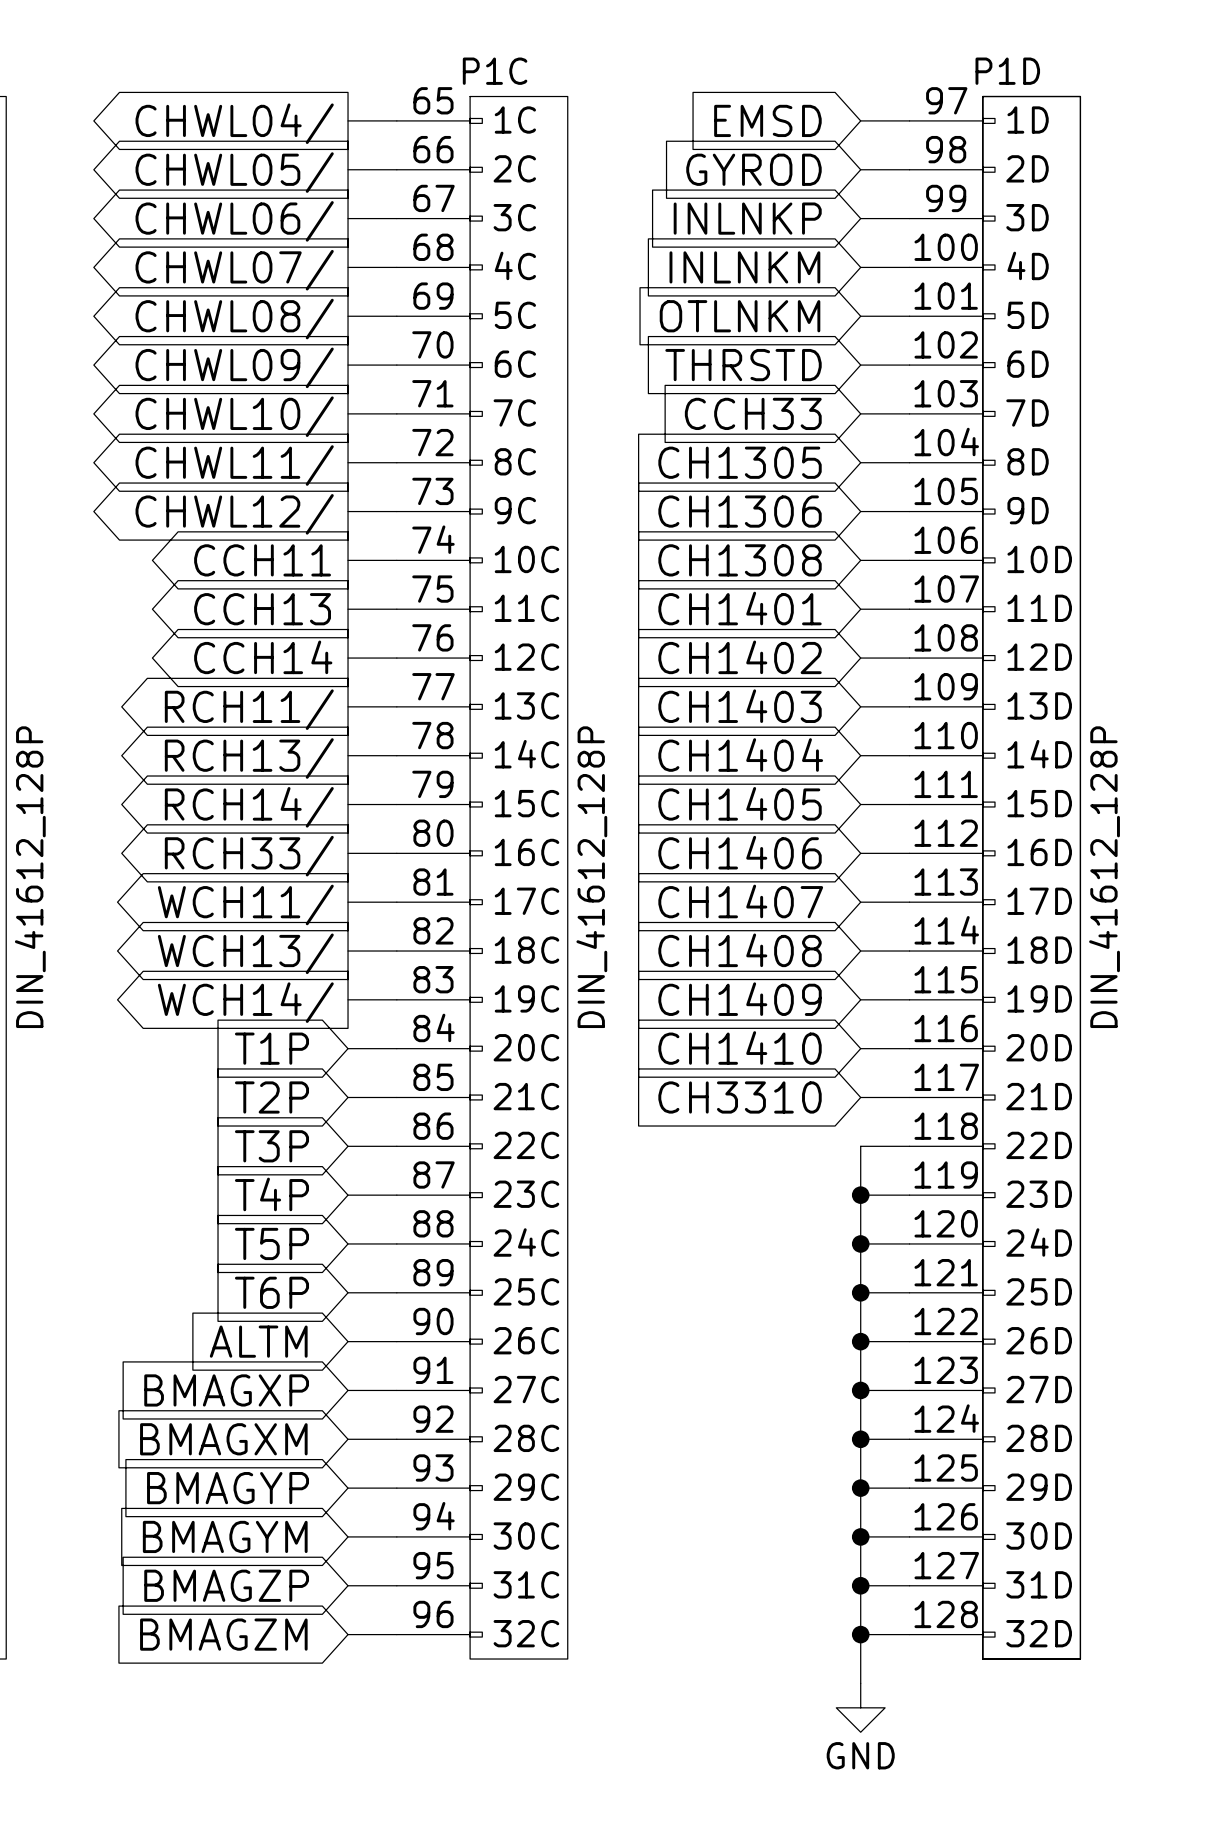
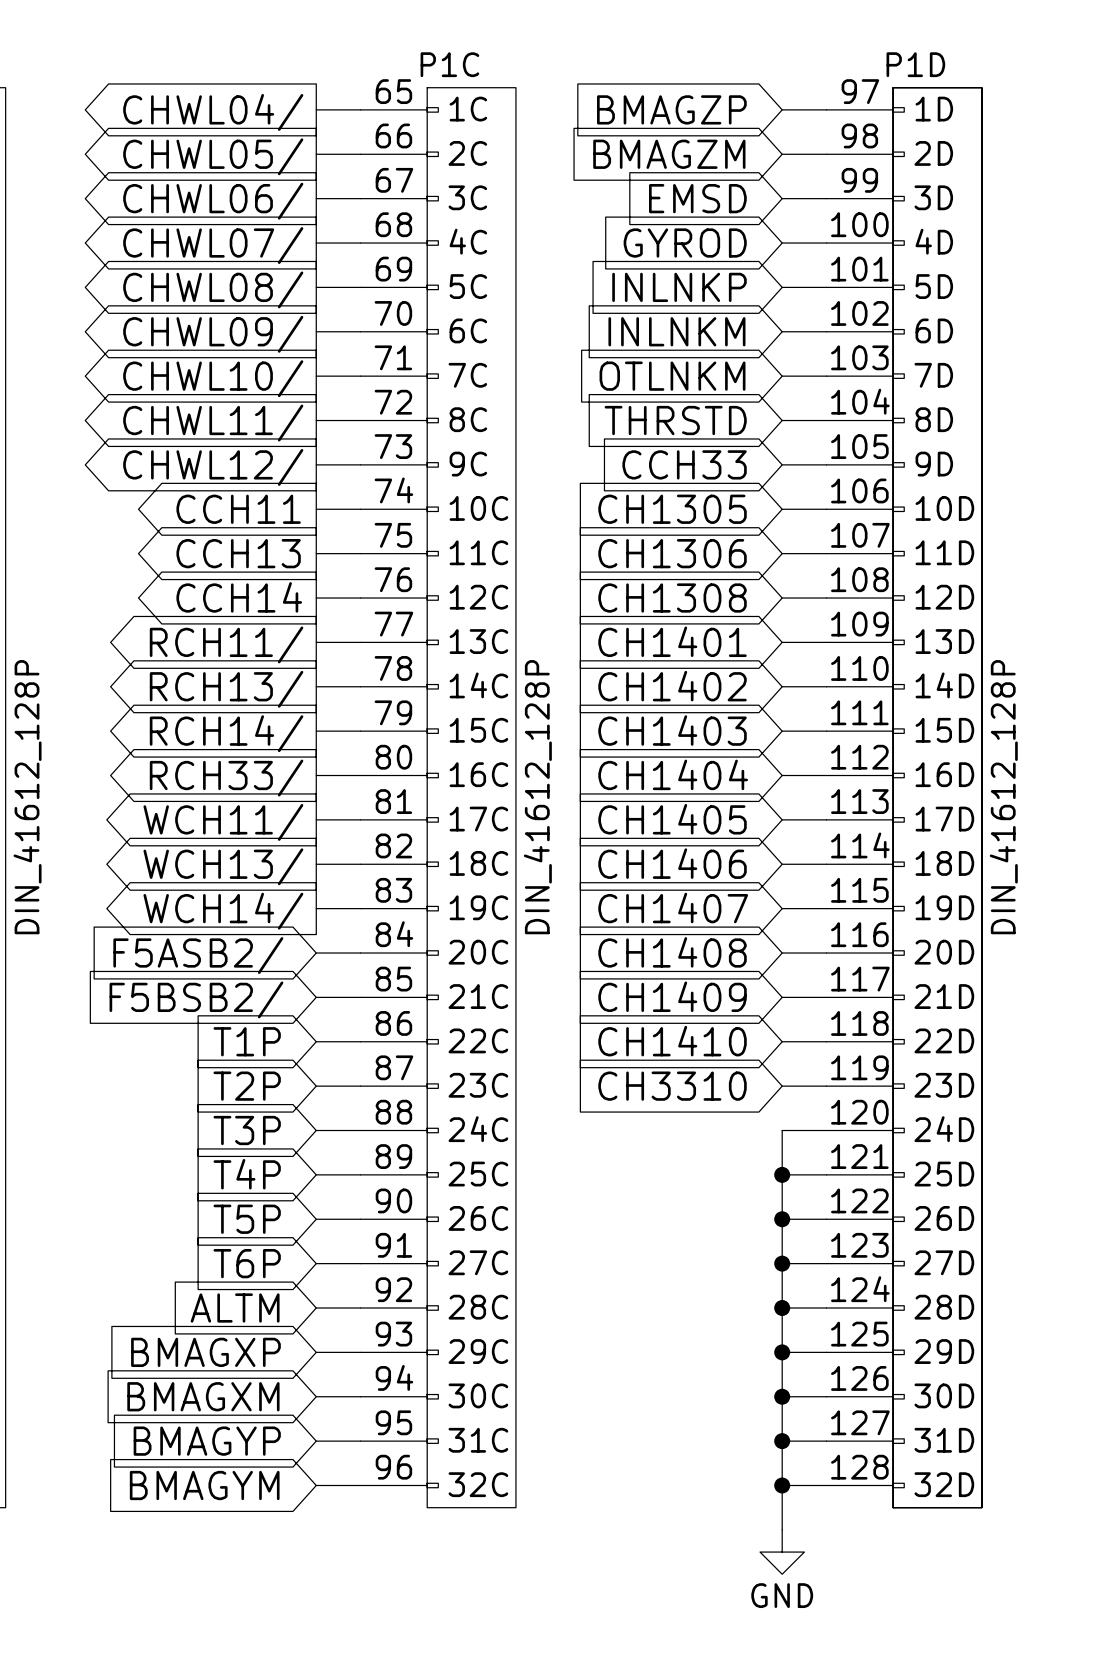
global label: EMSD (767, 120) -> BMAGZP (671, 109)
global label: GYROD (753, 169) -> BMAGZM (669, 154)
global label: INLNKP (747, 218) -> EMSD (697, 198)
global label: INLNKM (744, 267) -> GYROD (685, 243)
global label: OTLNKM (740, 316) -> INLNKP (679, 287)
global label: THRSTD (743, 365) -> INLNKM (676, 331)
global label: CCH33 (753, 413) -> OTLNKM (672, 376)
global label: CH1305 (740, 462) -> THRSTD (675, 420)
global label: CH1306 (740, 511) -> CCH33 (684, 464)
global label: CH1308 (740, 560) -> CH1305 (672, 509)
global label: CH1401 (740, 608) -> CH1306 (672, 553)
global label: CH1402 (740, 657) -> CH1308 (672, 598)
global label: CH1403 (740, 706) -> CH1401 (672, 641)
global label: CH1404 (740, 754) -> CH1402 (672, 686)
global label: CH1405 (740, 803) -> CH1403 (672, 730)
global label: CH1406 (740, 852) -> CH1404 (673, 774)
global label: CH1407 (740, 901) -> CH1405 (672, 819)
global label: CH1408 (740, 950) -> CH1406 (672, 863)
global label: CH1409 (740, 999) -> CH1407 (673, 908)
global label: CH1410 (740, 1047) -> CH1408 (672, 952)
global label: T1P (271, 1048) -> F5ASB2/ (198, 955)
global label: T2P (271, 1097) -> F5BSB2/ (196, 999)
global label: CH3310 (740, 1097) -> CH1409 (672, 996)
global label: none -> CH1410 (672, 1041)
global label: T3P (271, 1146) -> T1P (247, 1041)
wire: (860, 1146) (860, 1243) -> none
global label: T4P (271, 1194) -> T2P (247, 1086)
global label: none -> CH3310 (672, 1086)
junction: (860, 1195) -> none
global label: T5P (271, 1243) -> T3P (247, 1130)
junction: (860, 1243) -> none
global label: T6P (271, 1292) -> T4P (247, 1174)
global label: ALTM (258, 1341) -> T5P (247, 1219)
global label: BMAGXP (226, 1390) -> T6P (247, 1263)
global label: BMAGXM (223, 1439) -> ALTM (235, 1308)
global label: BMAGYP (228, 1488) -> BMAGXP (205, 1352)
global label: BMAGYM (225, 1536) -> BMAGXM (203, 1396)
global label: BMAGZP (226, 1585) -> BMAGYP (207, 1441)
global label: BMAGZM (223, 1634) -> BMAGYM (204, 1485)

